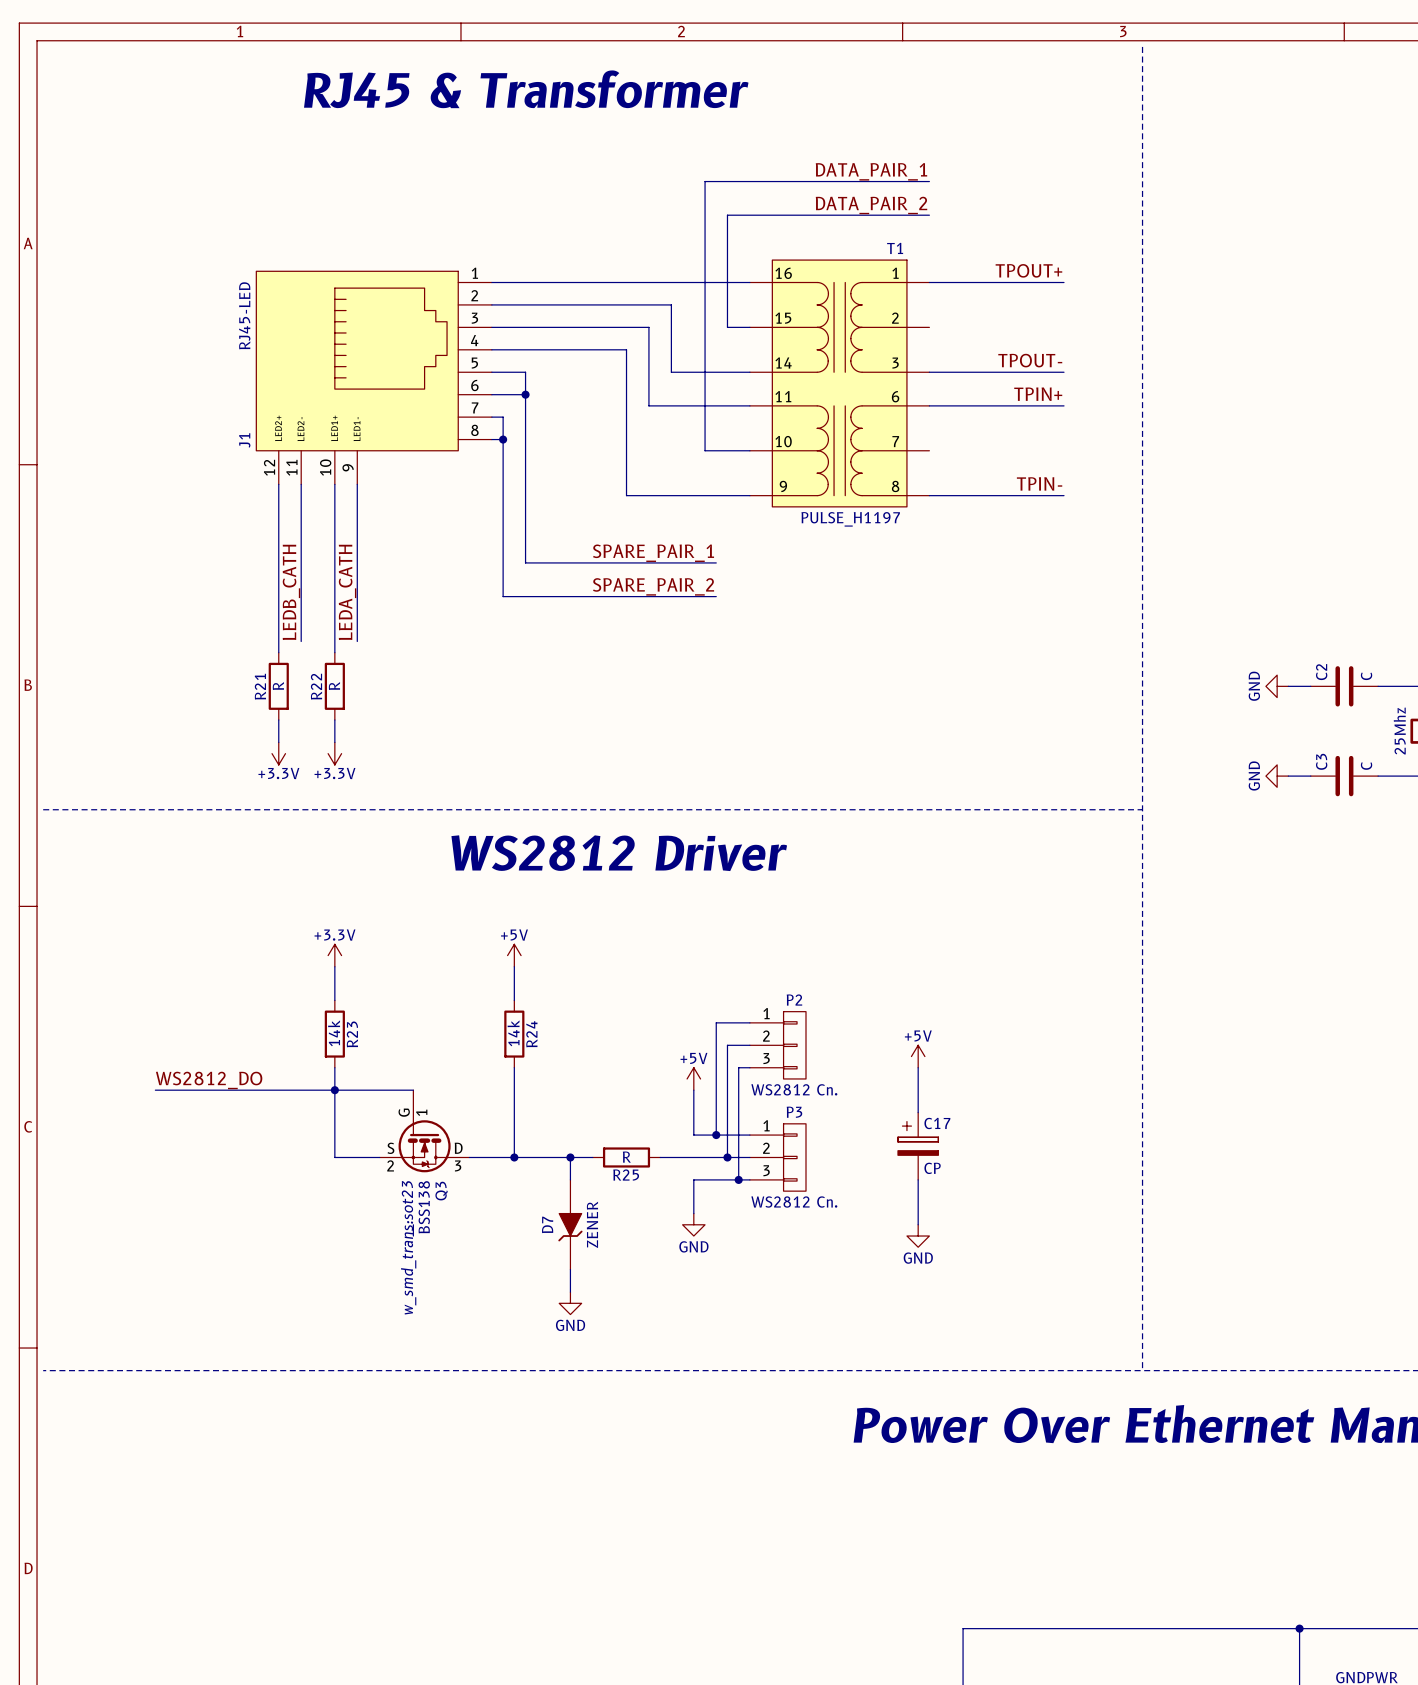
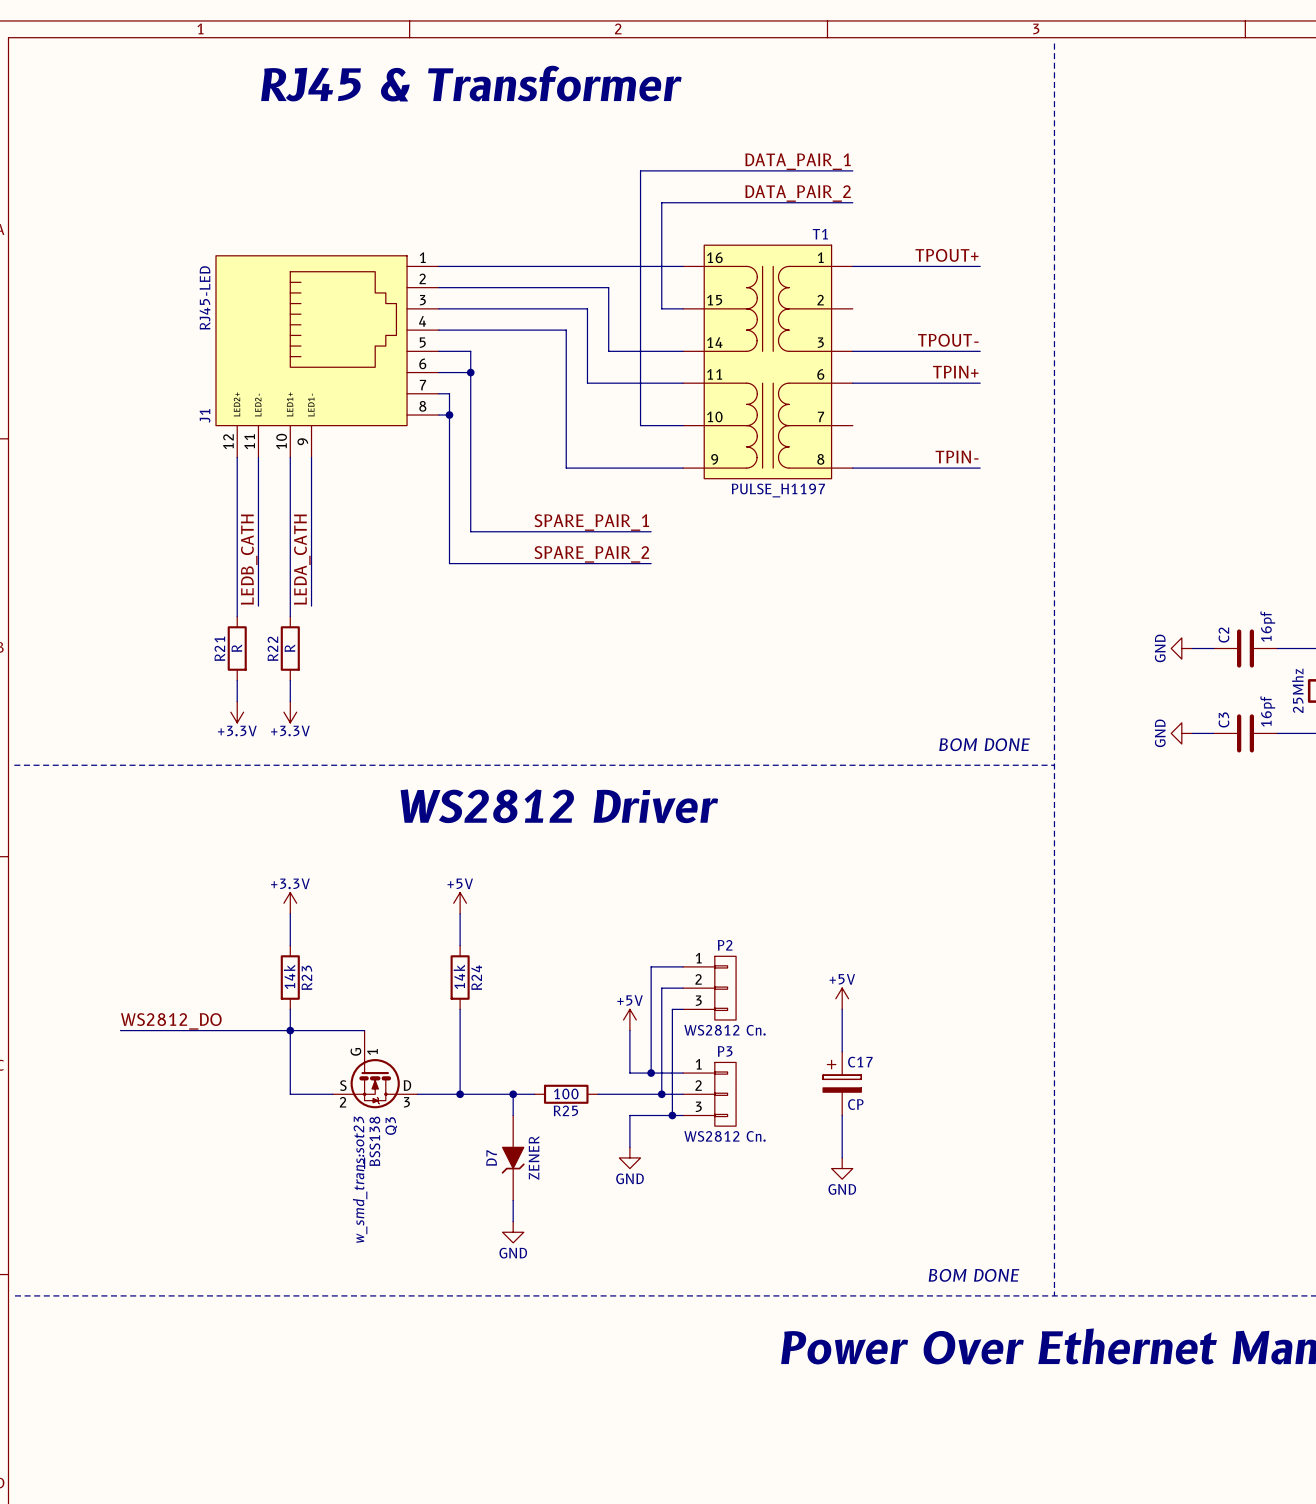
C2 value: C (1366, 676) -> 16pf (1267, 626)
C3 value: C (1366, 766) -> 16pf (1267, 711)
text: none -> BOM DONE (984, 744)
R25 value: R (626, 1157) -> 100 (566, 1093)
text: none -> BOM DONE (973, 1275)

